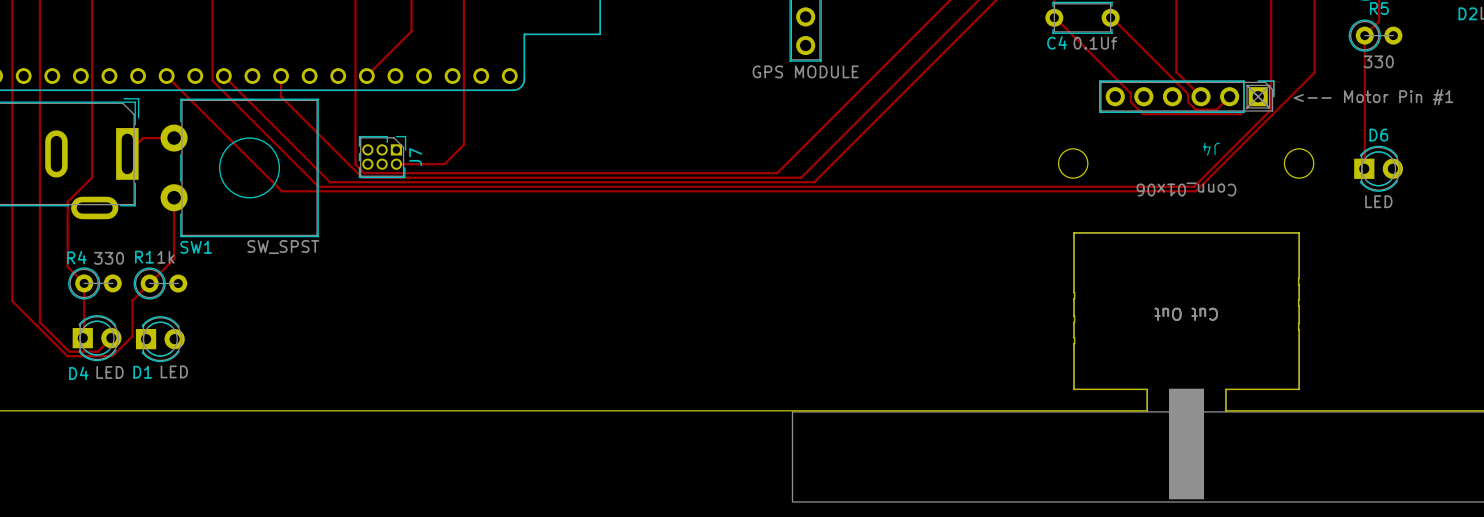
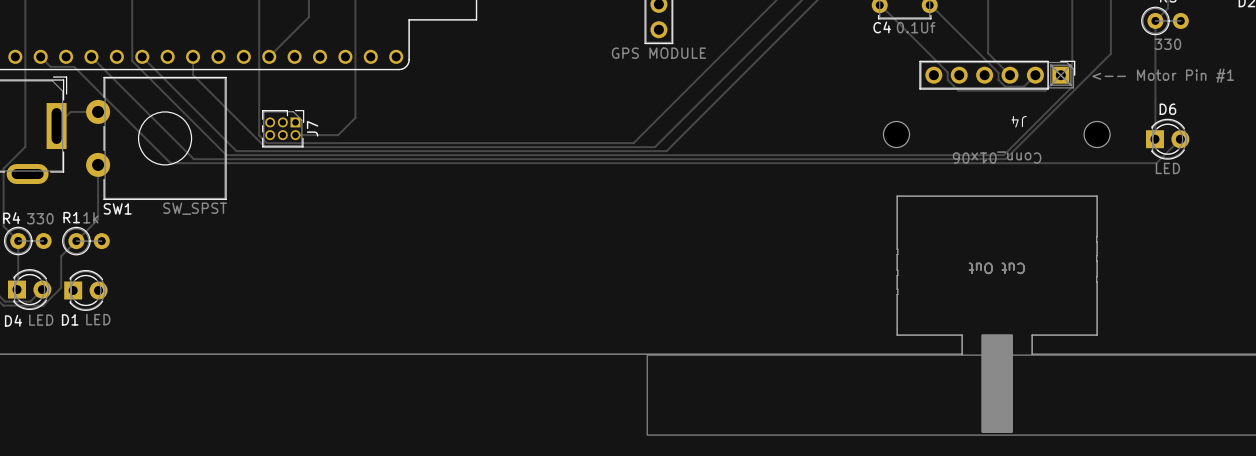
track: none -> (40, 56) (50, 66) (74, 66) (170, 163) (1156, 163) (1180, 139)

